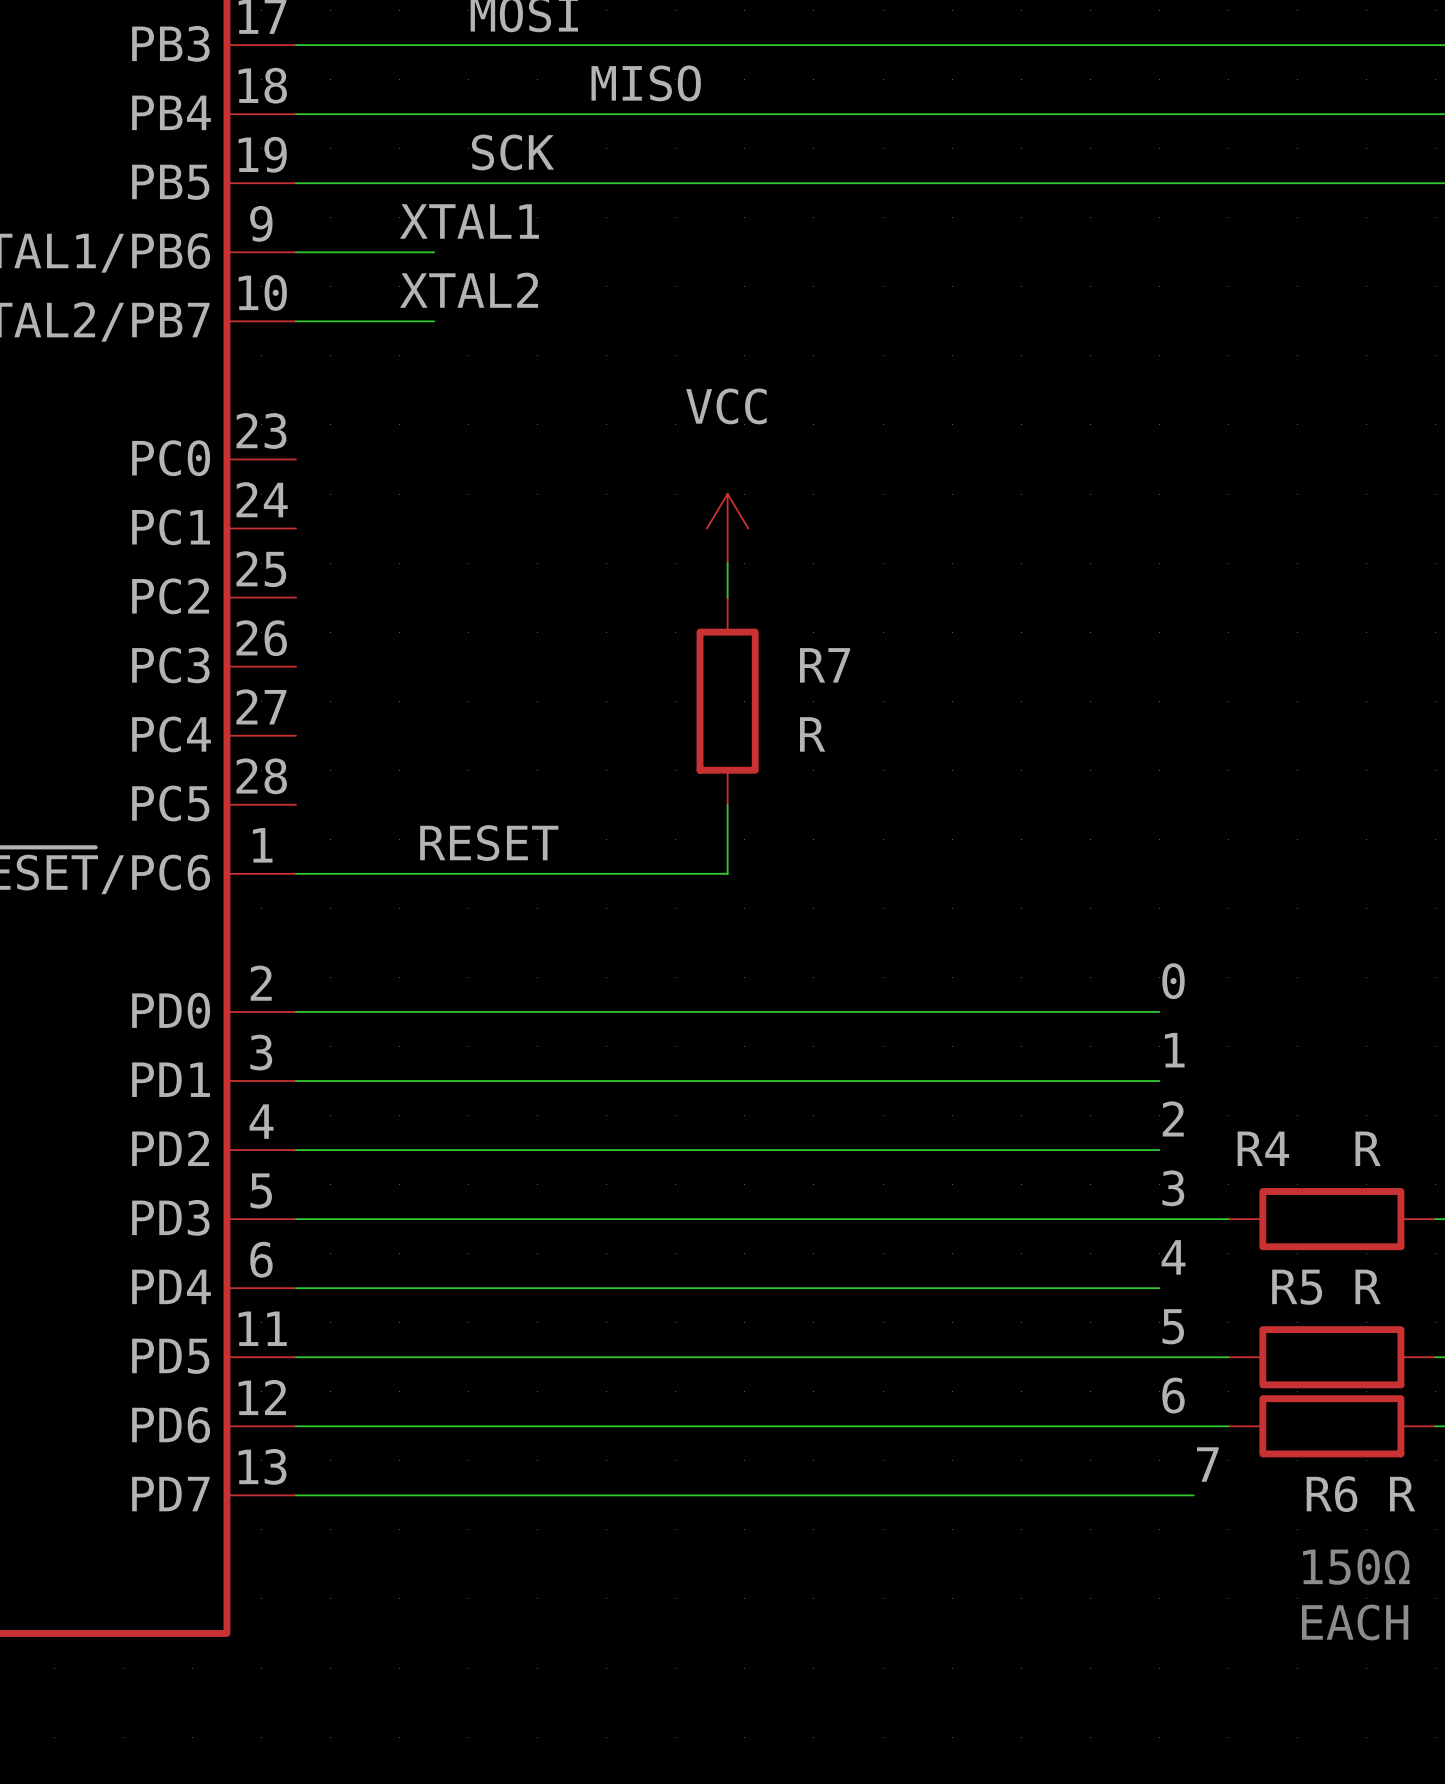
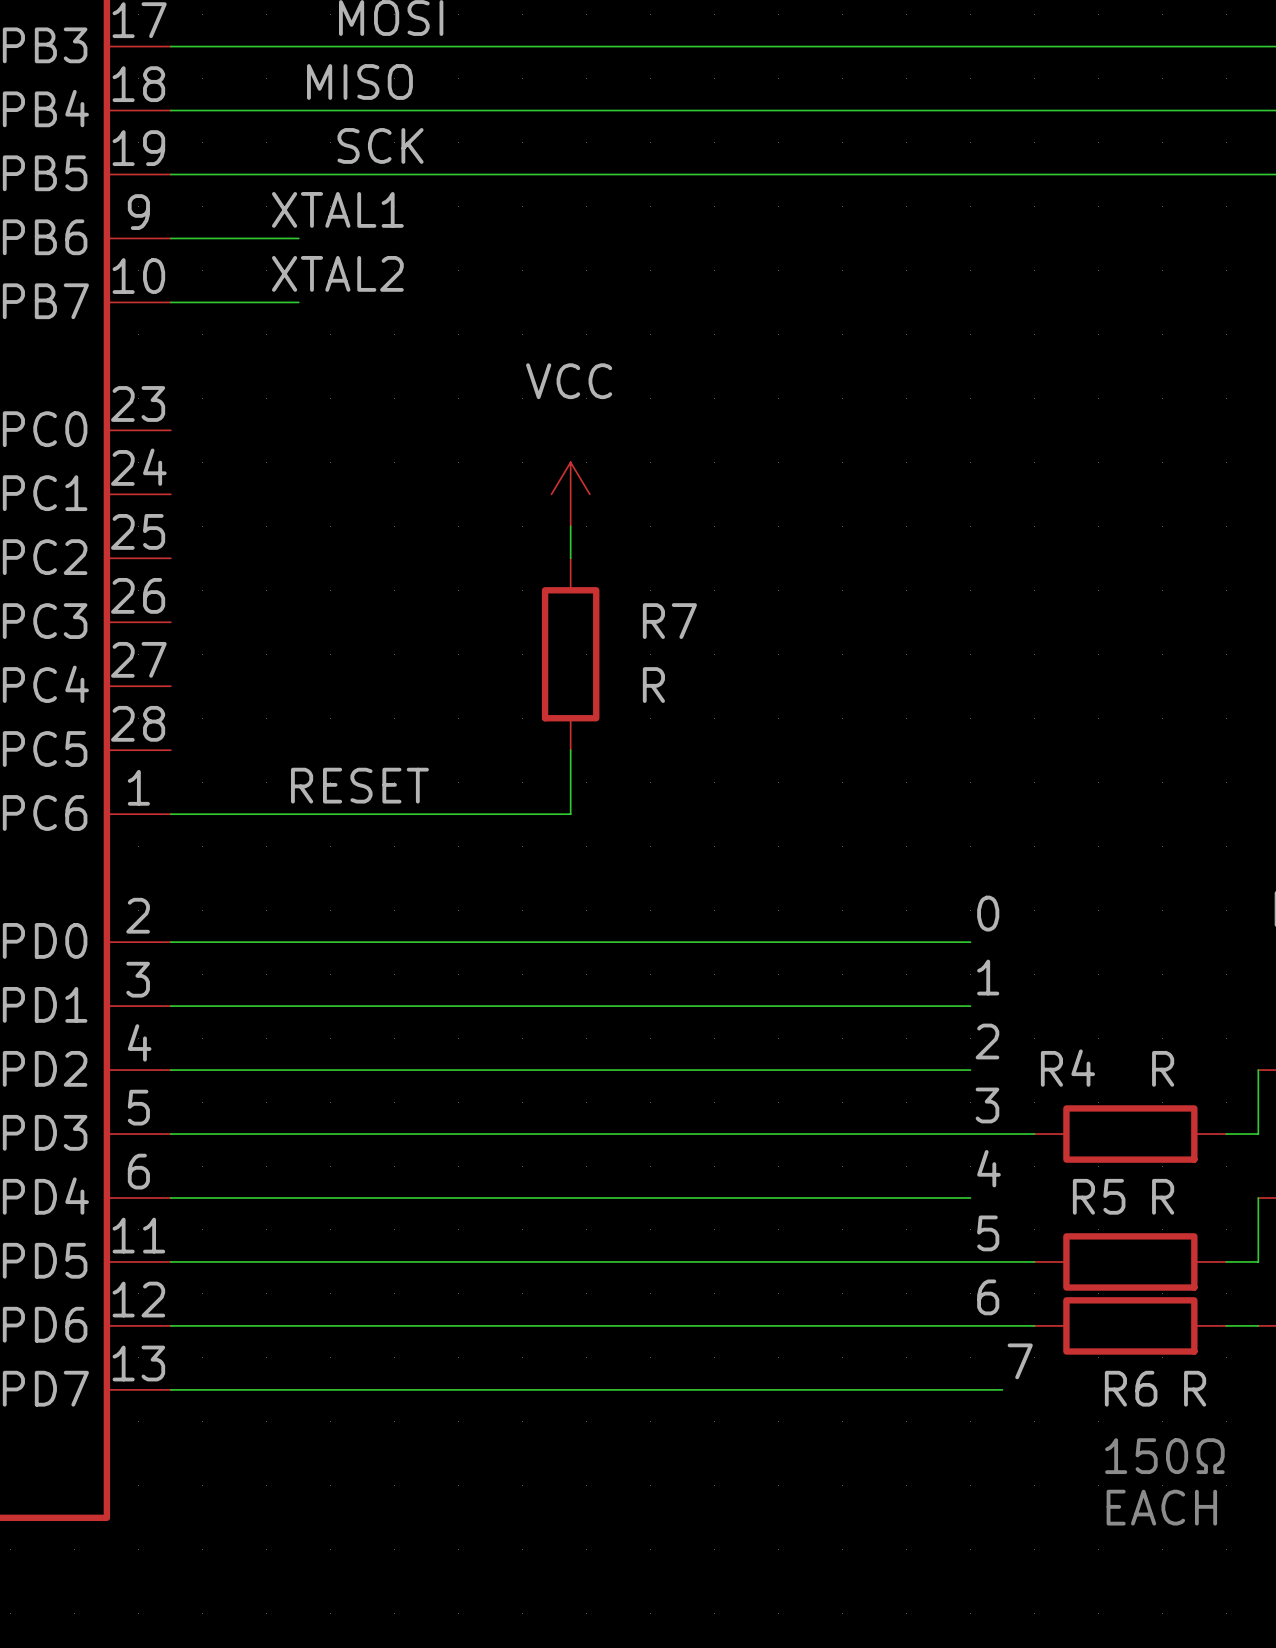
label position: MISO (646, 83) -> MISO (359, 81)

